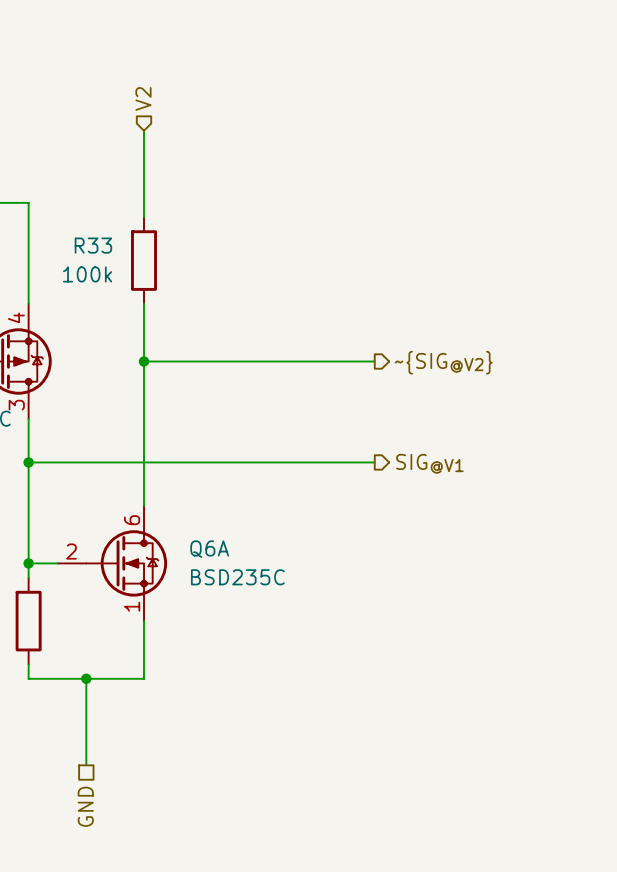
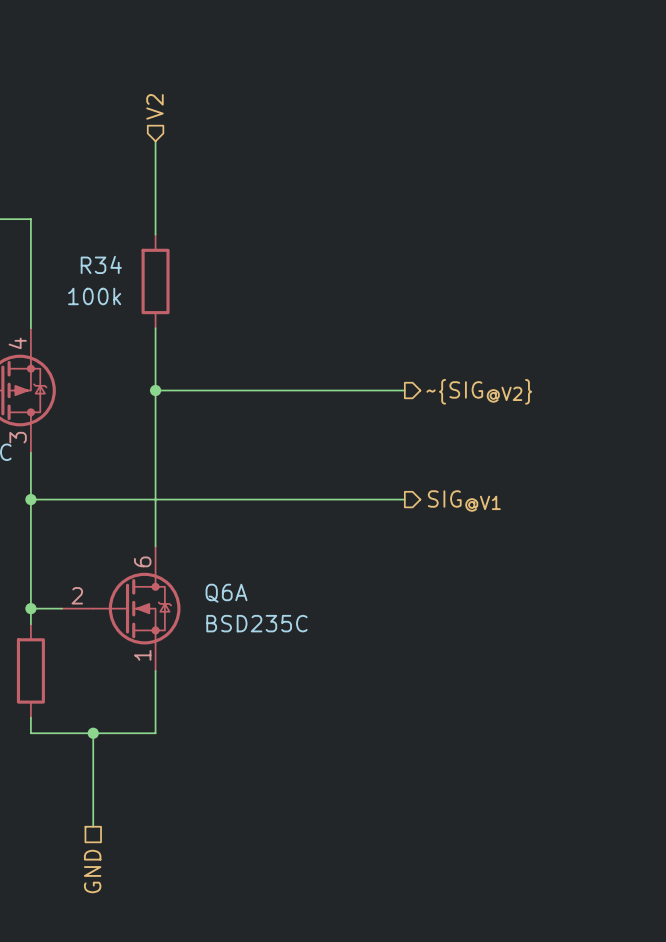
R33 name: R33 (93, 245) -> R34 (101, 264)

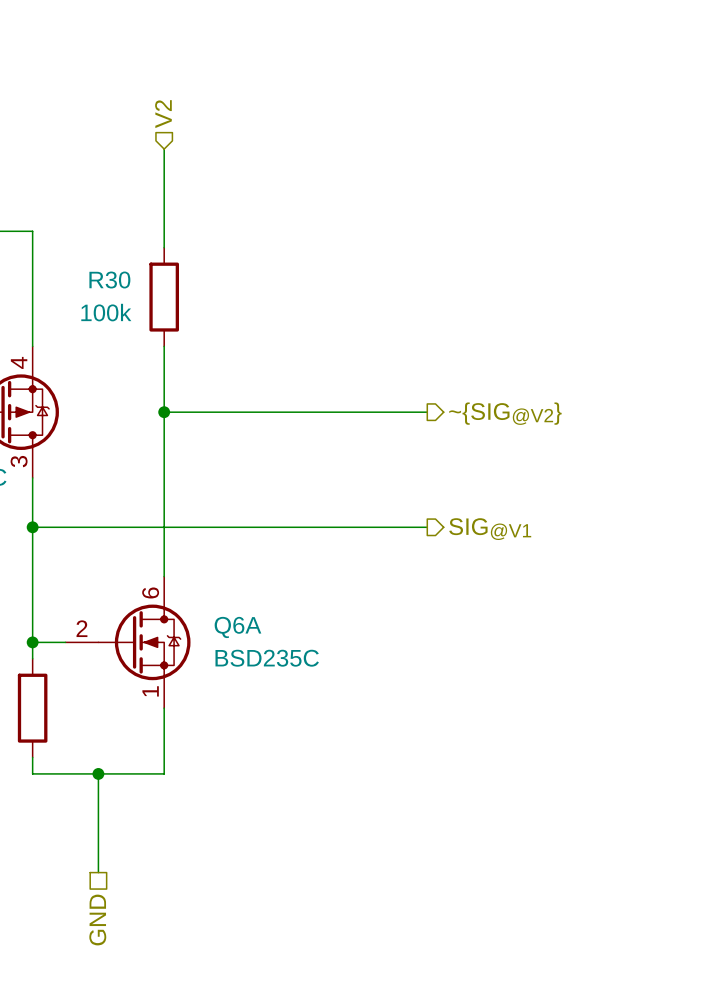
R34 name: R34 (101, 264) -> R30 (109, 280)

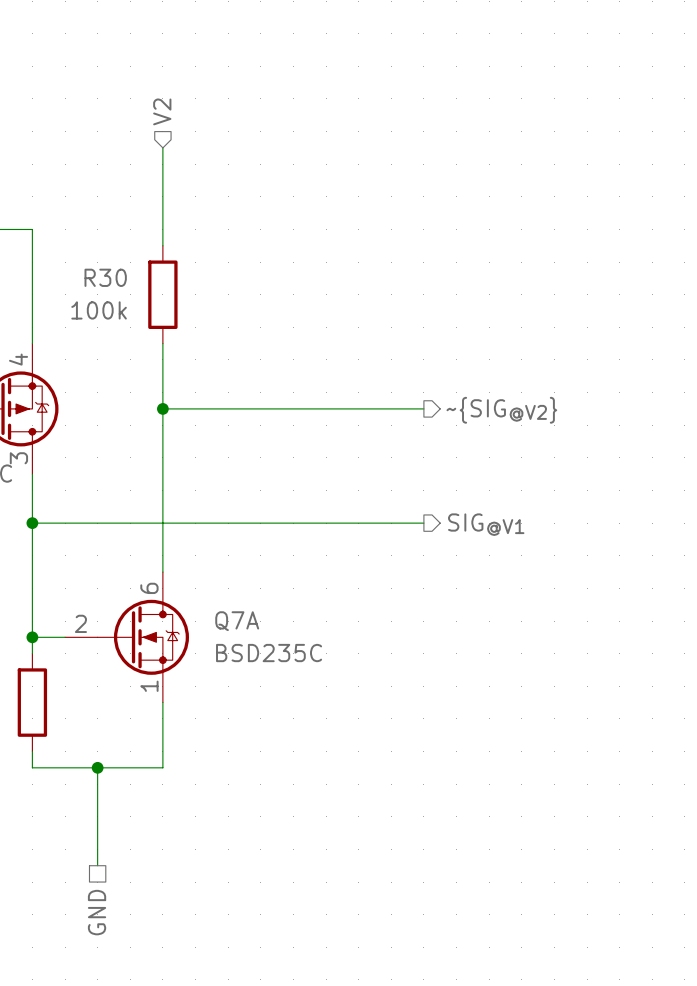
Q6A name: Q6A (237, 627) -> Q7A (237, 621)

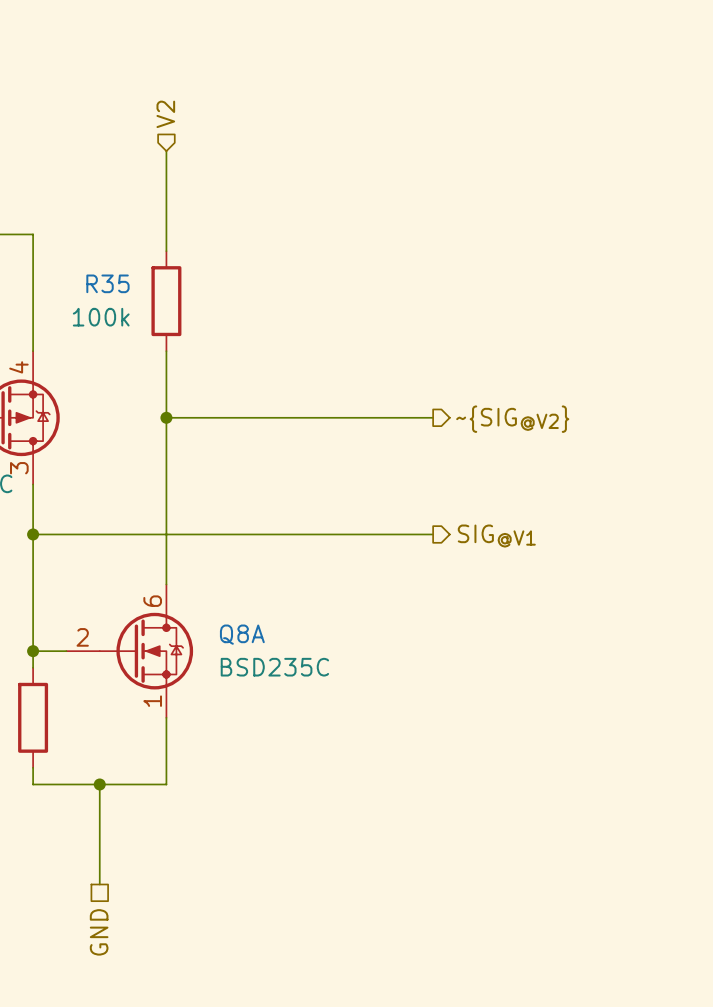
R30 name: R30 (105, 277) -> R35 (107, 283)
Q7A name: Q7A (237, 621) -> Q8A (242, 634)

